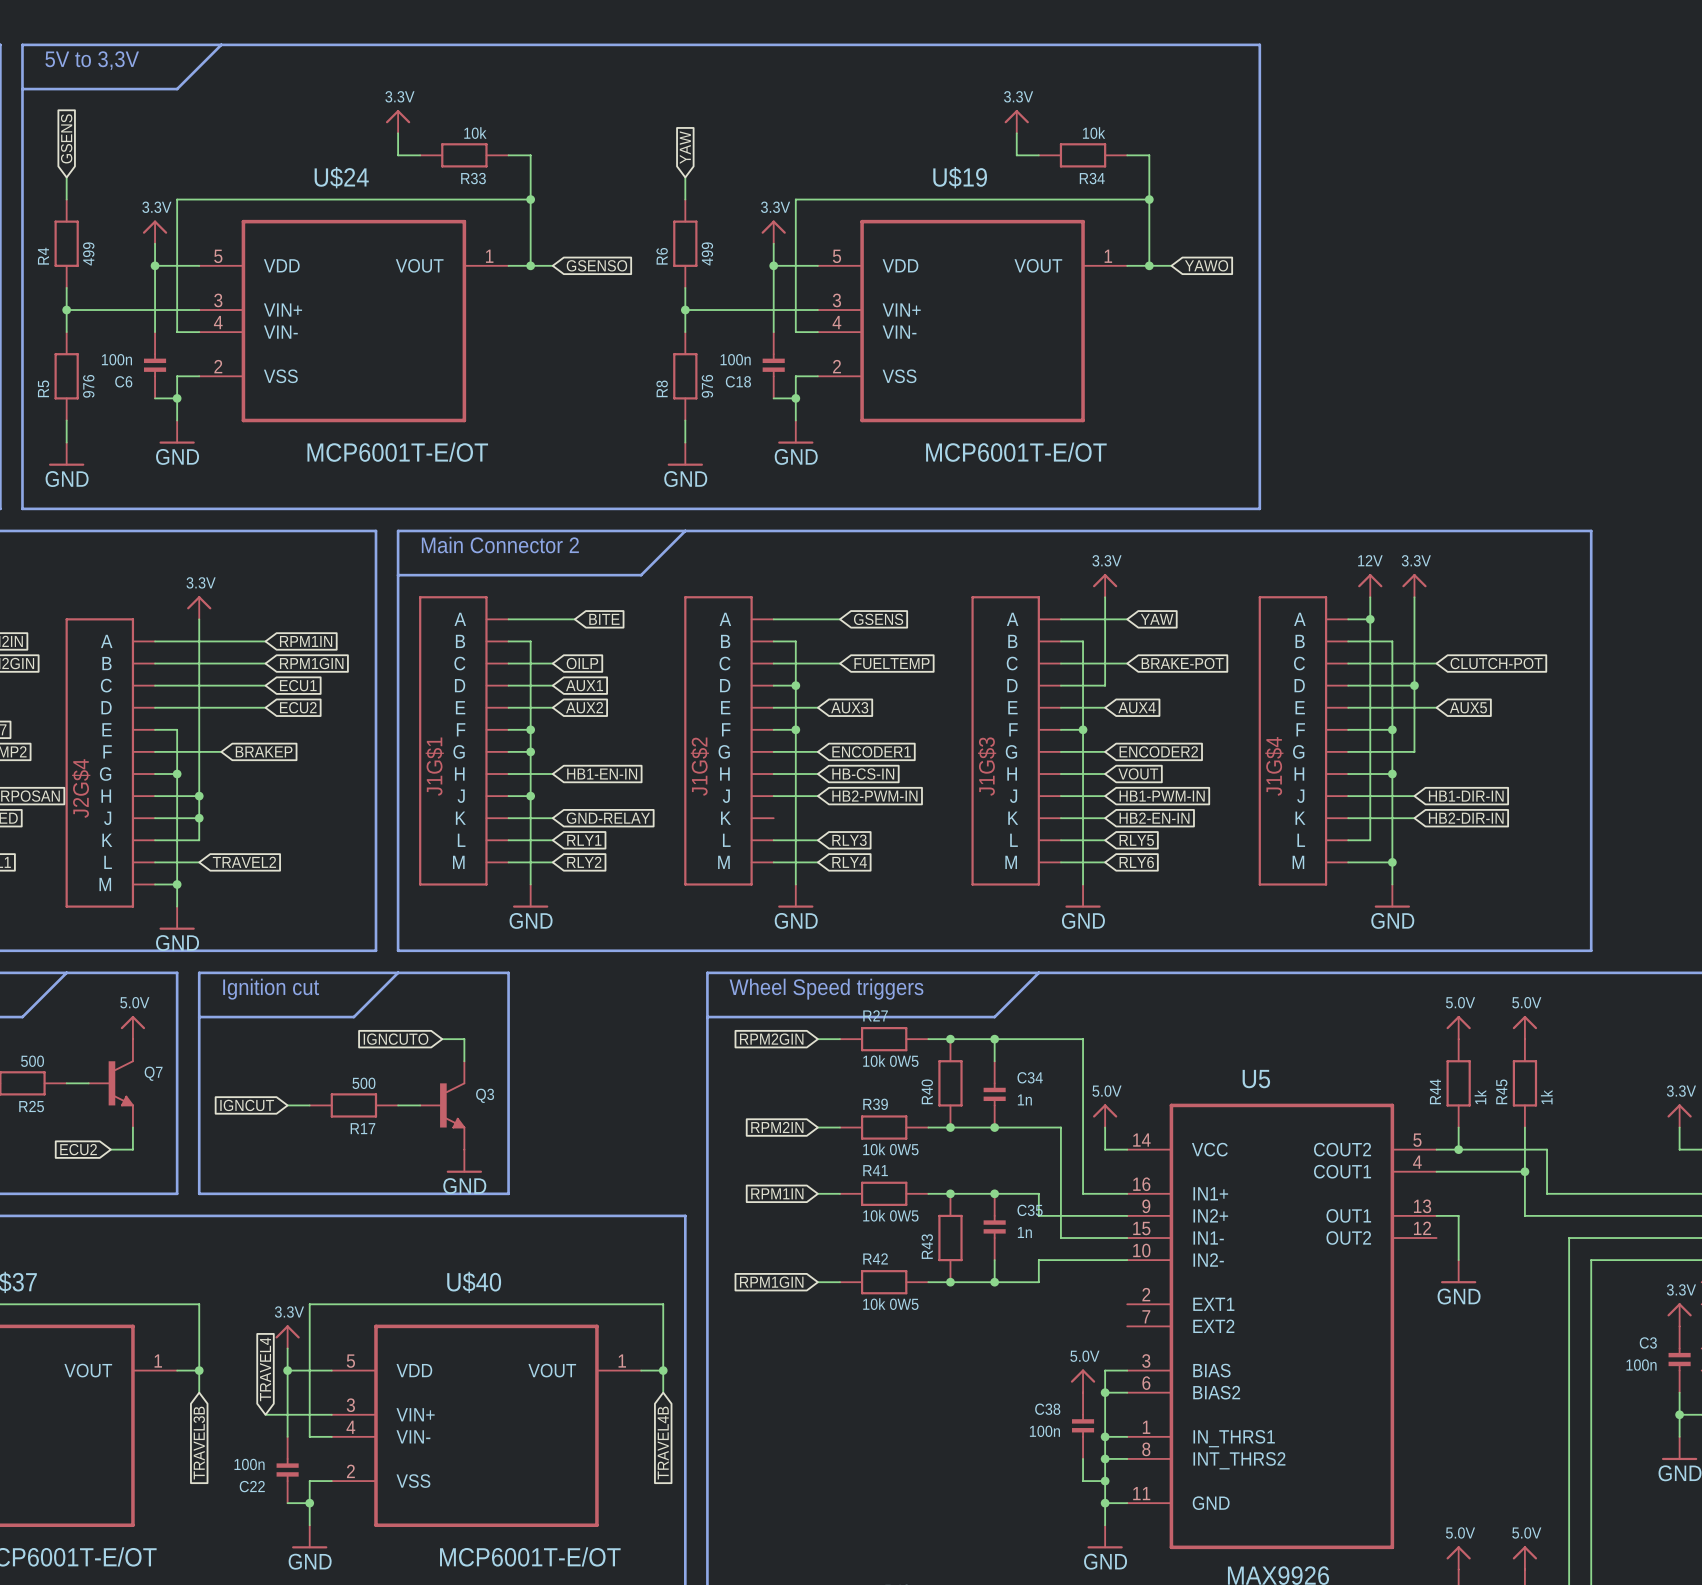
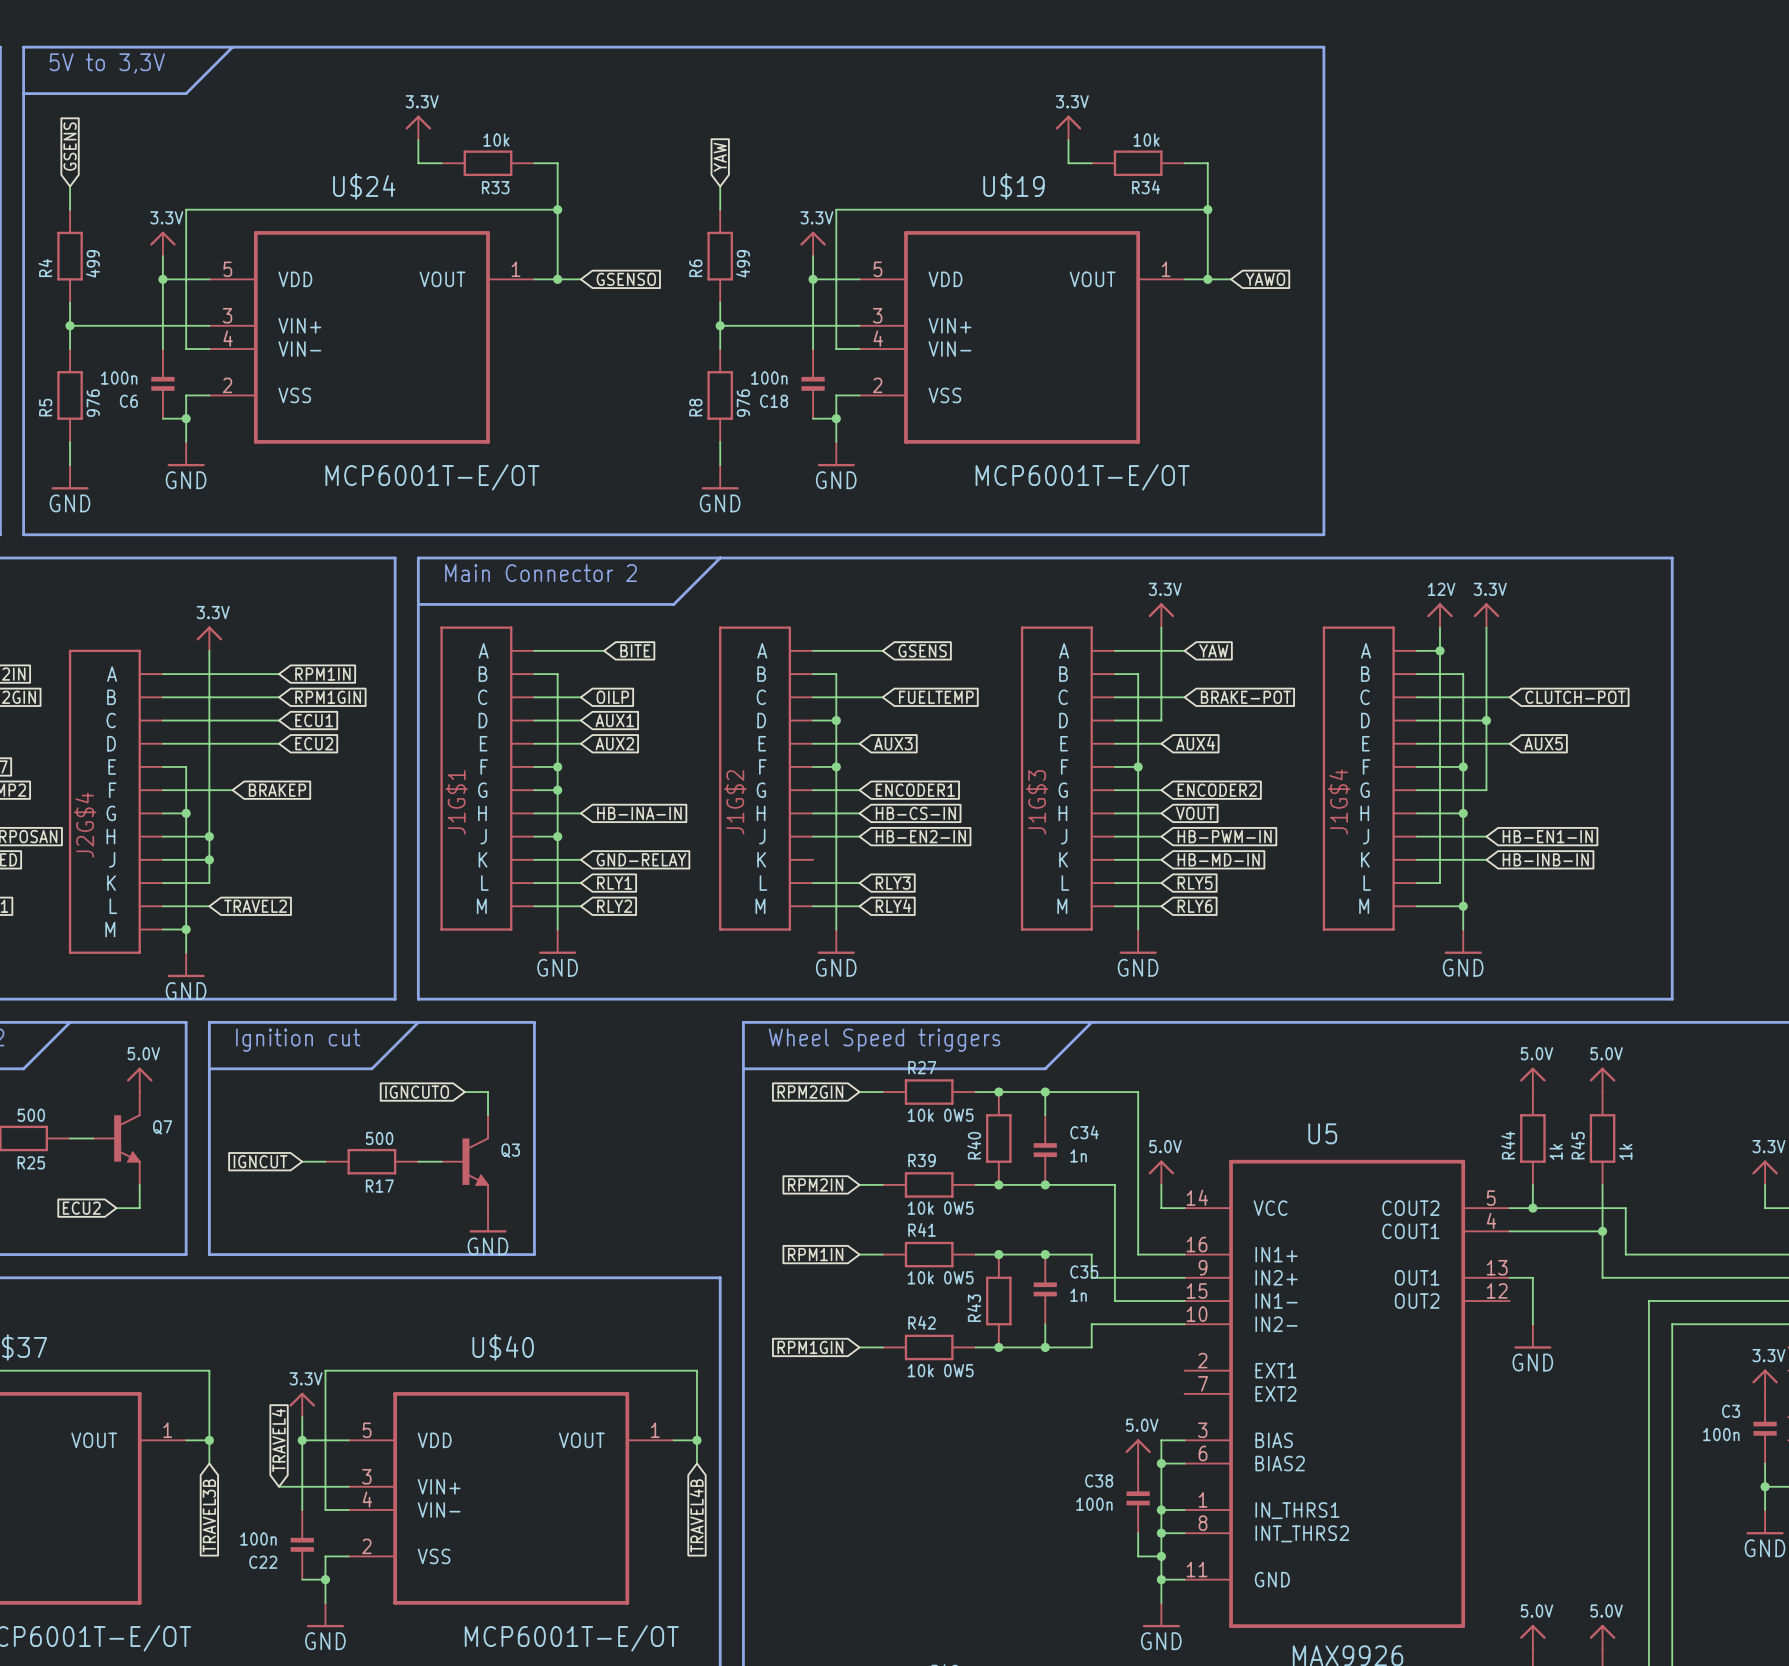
global label: HB1-EN-IN (602, 774) -> HB-INA-IN (639, 813)
global label: HB2-PWM-IN (874, 796) -> HB-EN2-IN (920, 836)
global label: HB1-PWM-IN (1162, 796) -> HB-PWM-IN (1224, 836)
global label: HB1-DIR-IN (1466, 796) -> HB-EN1-IN (1547, 836)
global label: HB2-EN-IN (1154, 818) -> HB-MD-IN (1218, 859)
global label: HB2-DIR-IN (1466, 818) -> HB-INB-IN (1545, 859)

